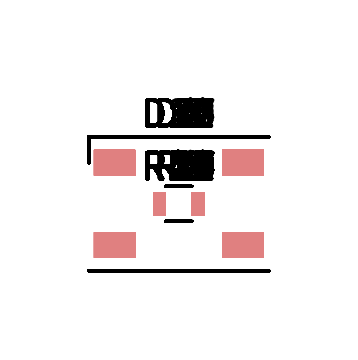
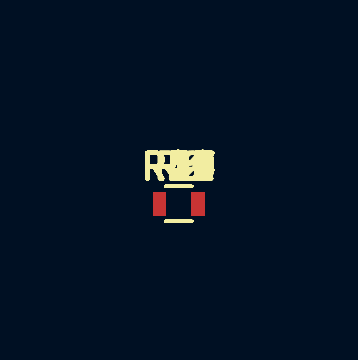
part: (178, 203) -> none
part: (178, 203) -> none
part: (178, 203) -> none
part: (178, 203) -> none
part: (178, 203) -> none
part: (178, 203) -> none
part: (178, 203) -> none
part: (178, 203) -> none
part: (178, 203) -> none
part: (178, 203) -> none
part: (178, 203) -> none
part: (178, 203) -> none
part: (178, 203) -> none
part: (178, 203) -> none
part: (178, 203) -> none
part: (178, 203) -> none
part: (178, 203) -> none
part: (178, 203) -> none
part: (178, 203) -> none
part: (178, 203) -> none
part: (178, 203) -> none
part: (178, 203) -> none
part: (178, 203) -> none

